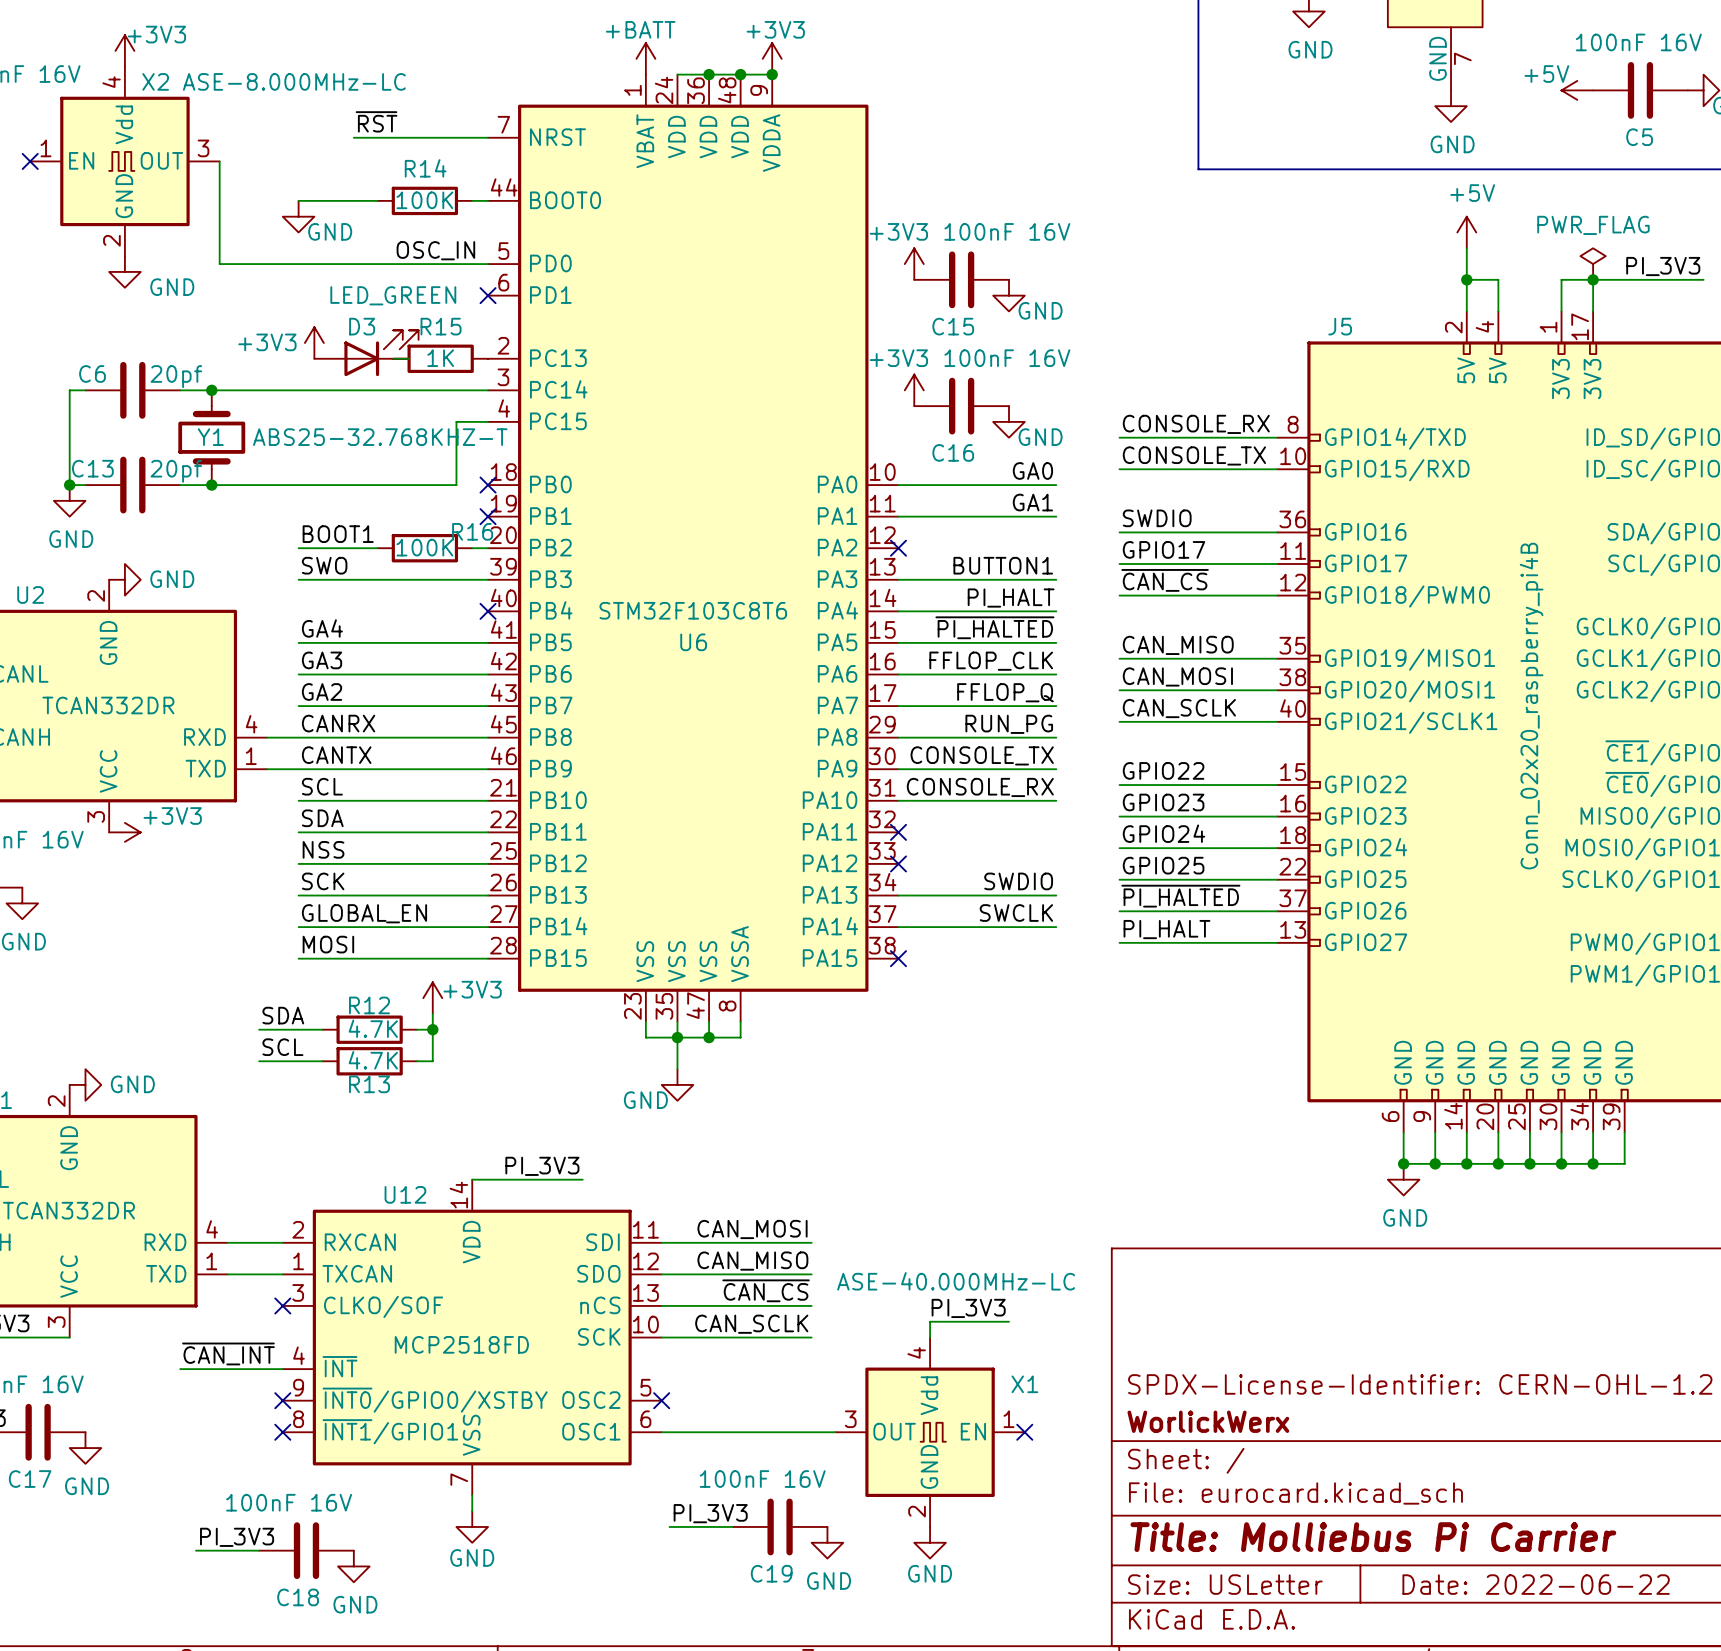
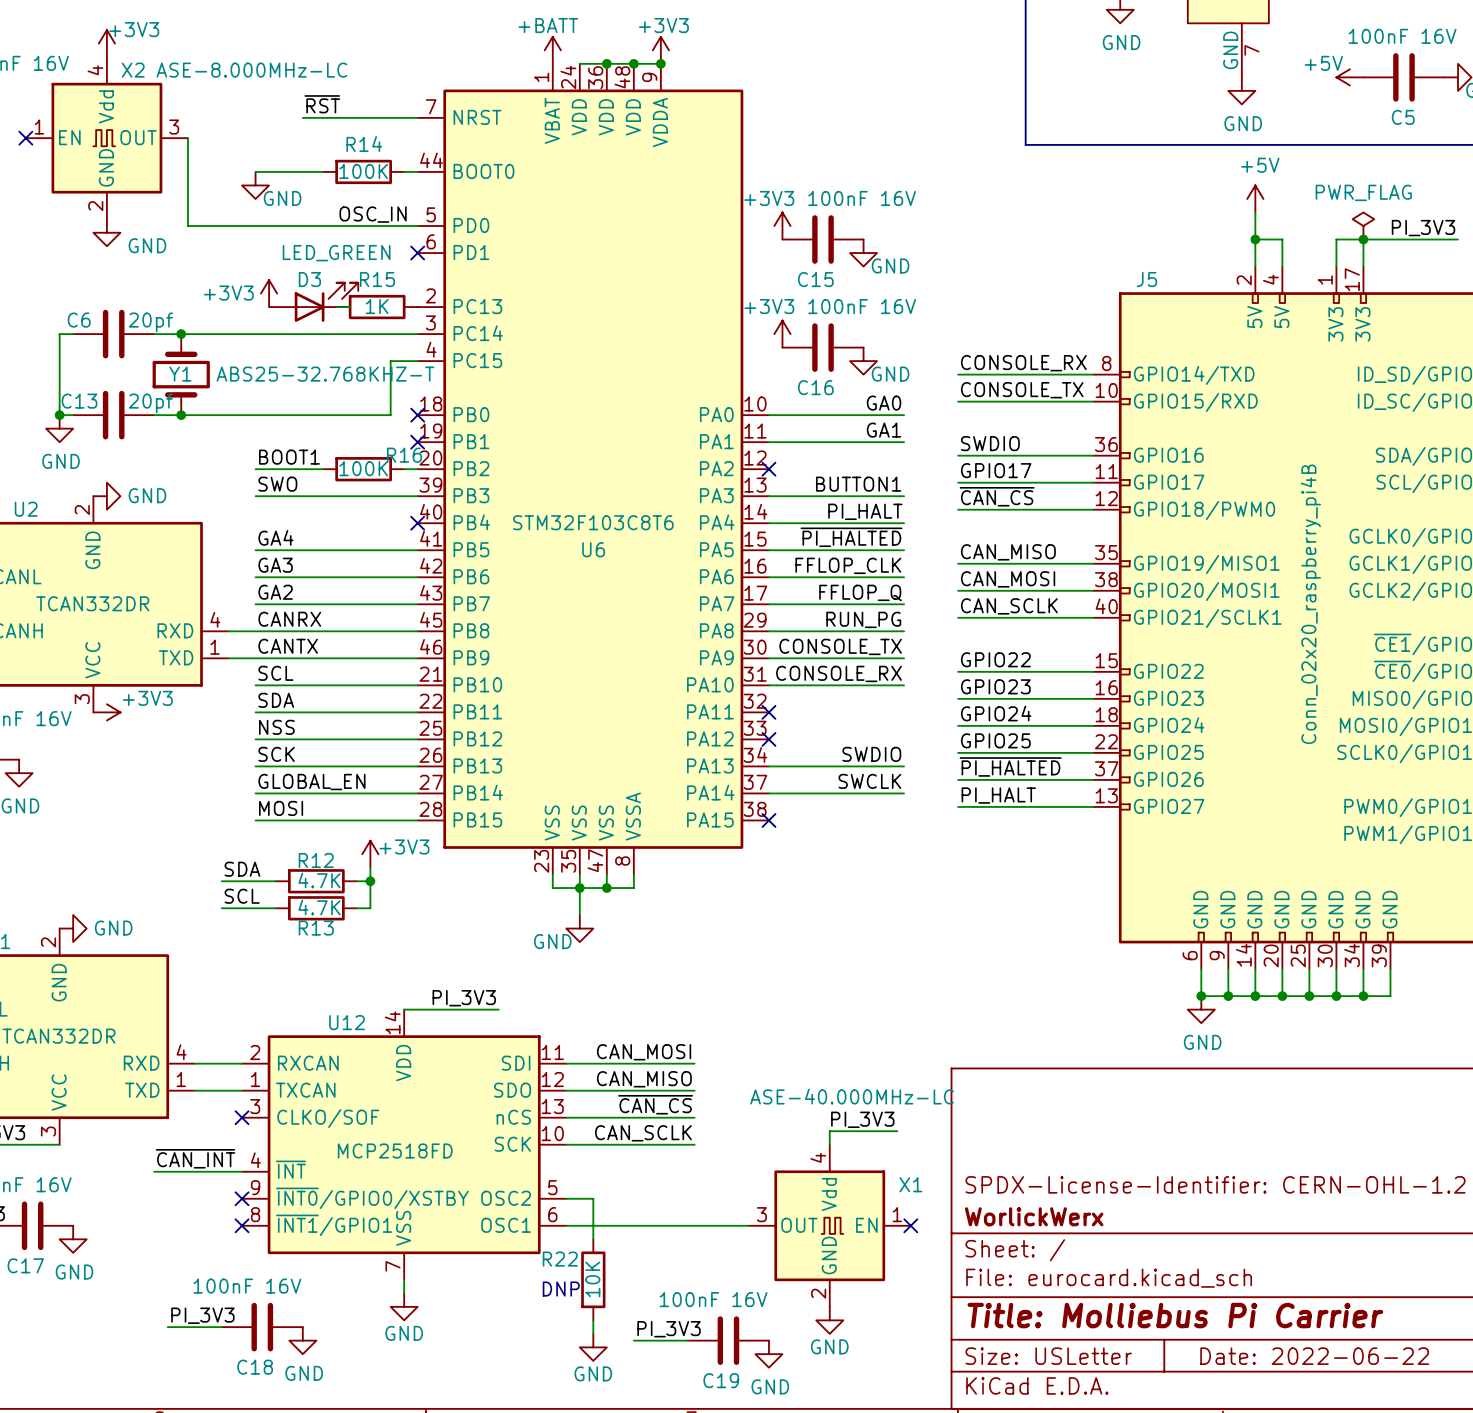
label position: PI_3V3 (968, 1308) -> PI_3V3 (862, 1119)
wire: (969, 1321) (930, 1321) (930, 1337) -> (829, 1131) (829, 1144)
wire: none -> (863, 1131) (897, 1131)
wire: none -> (566, 1198) (593, 1198) (593, 1239)
no-connect mark: (661, 1400) -> none
X1 position: (930, 1432) -> (829, 1225)
no-connect mark position: (1024, 1432) -> (910, 1225)
R22: none -> 10K (593, 1279)
text: none -> DNP (561, 1289)
label position: PI_3V3 (710, 1513) -> PI_3V3 (669, 1329)
wire: (669, 1526) (732, 1526) -> (633, 1340) (687, 1340)
C19 position: (780, 1526) -> (728, 1340)
wire: none -> (593, 1320) (593, 1333)
power symbol: GND (827, 1542) -> none
power symbol: GND (930, 1542) -> none
power symbol: none -> GND (829, 1320)
power symbol: none -> GND (593, 1347)
power symbol: none -> GND (768, 1354)

